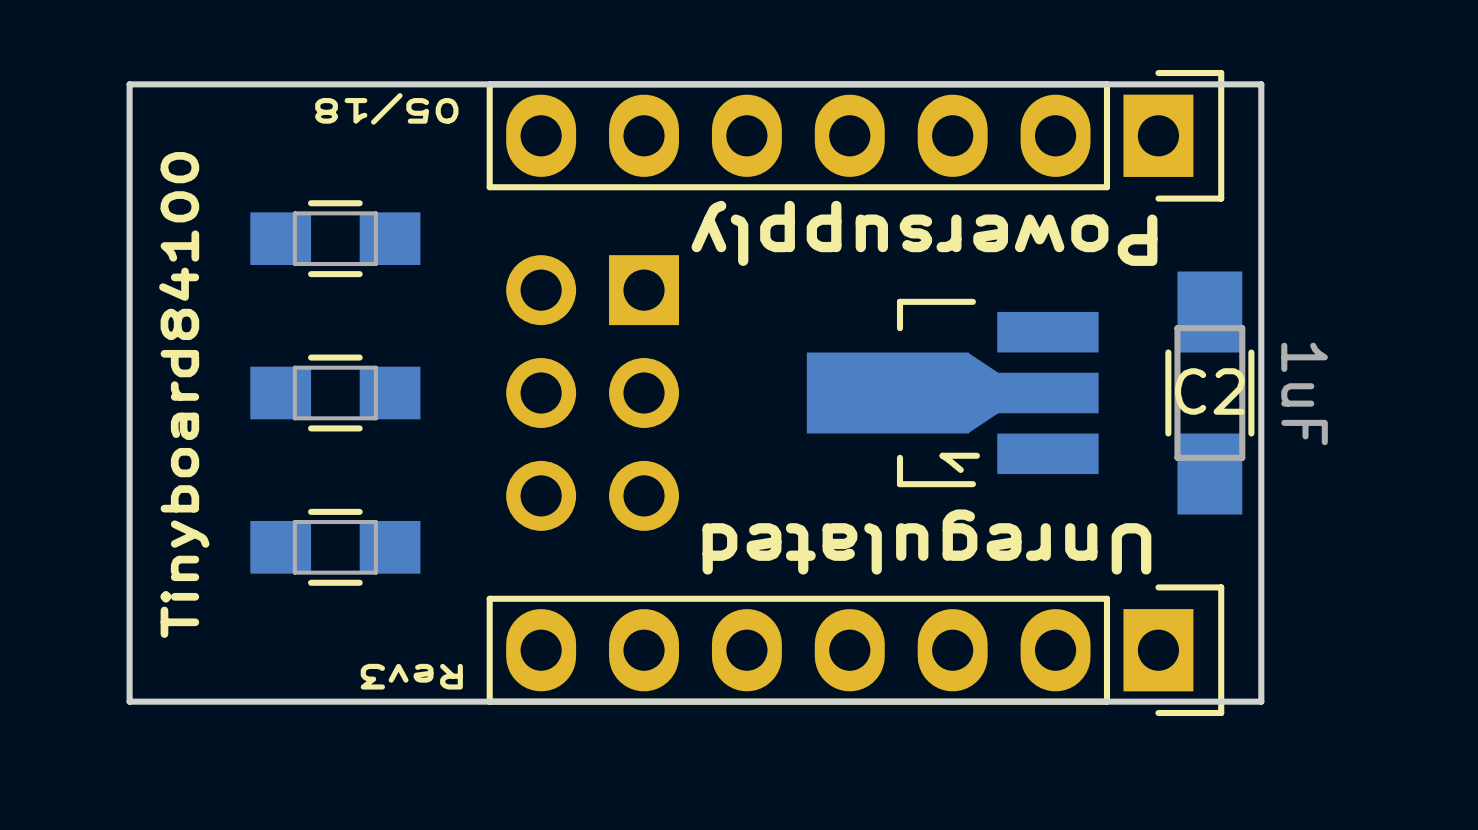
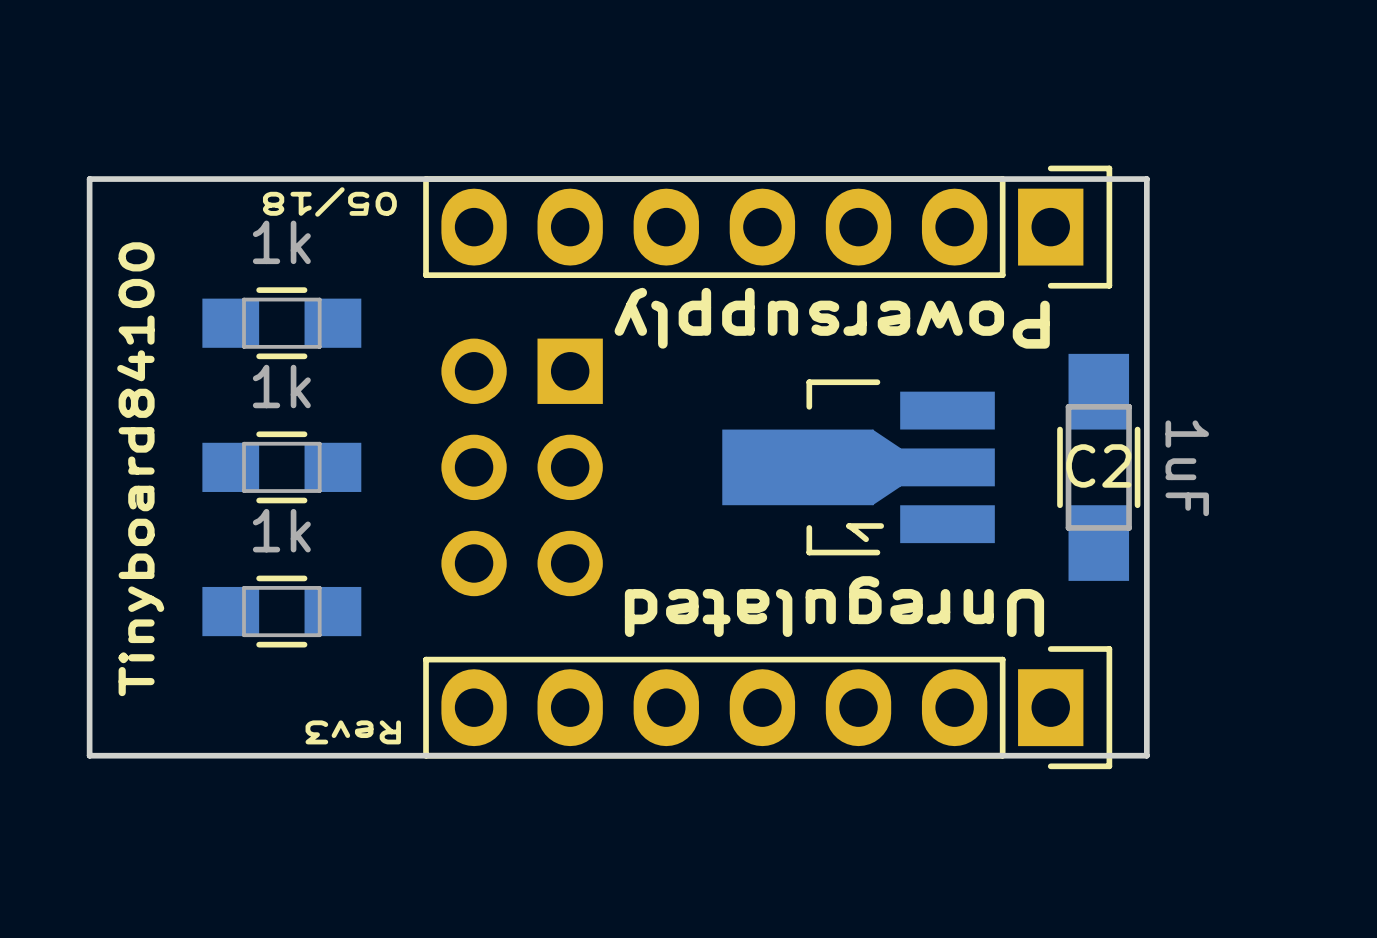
part value: none -> 1k (281, 242)
part value: none -> 1k (281, 386)
part value: none -> 1k (281, 530)

